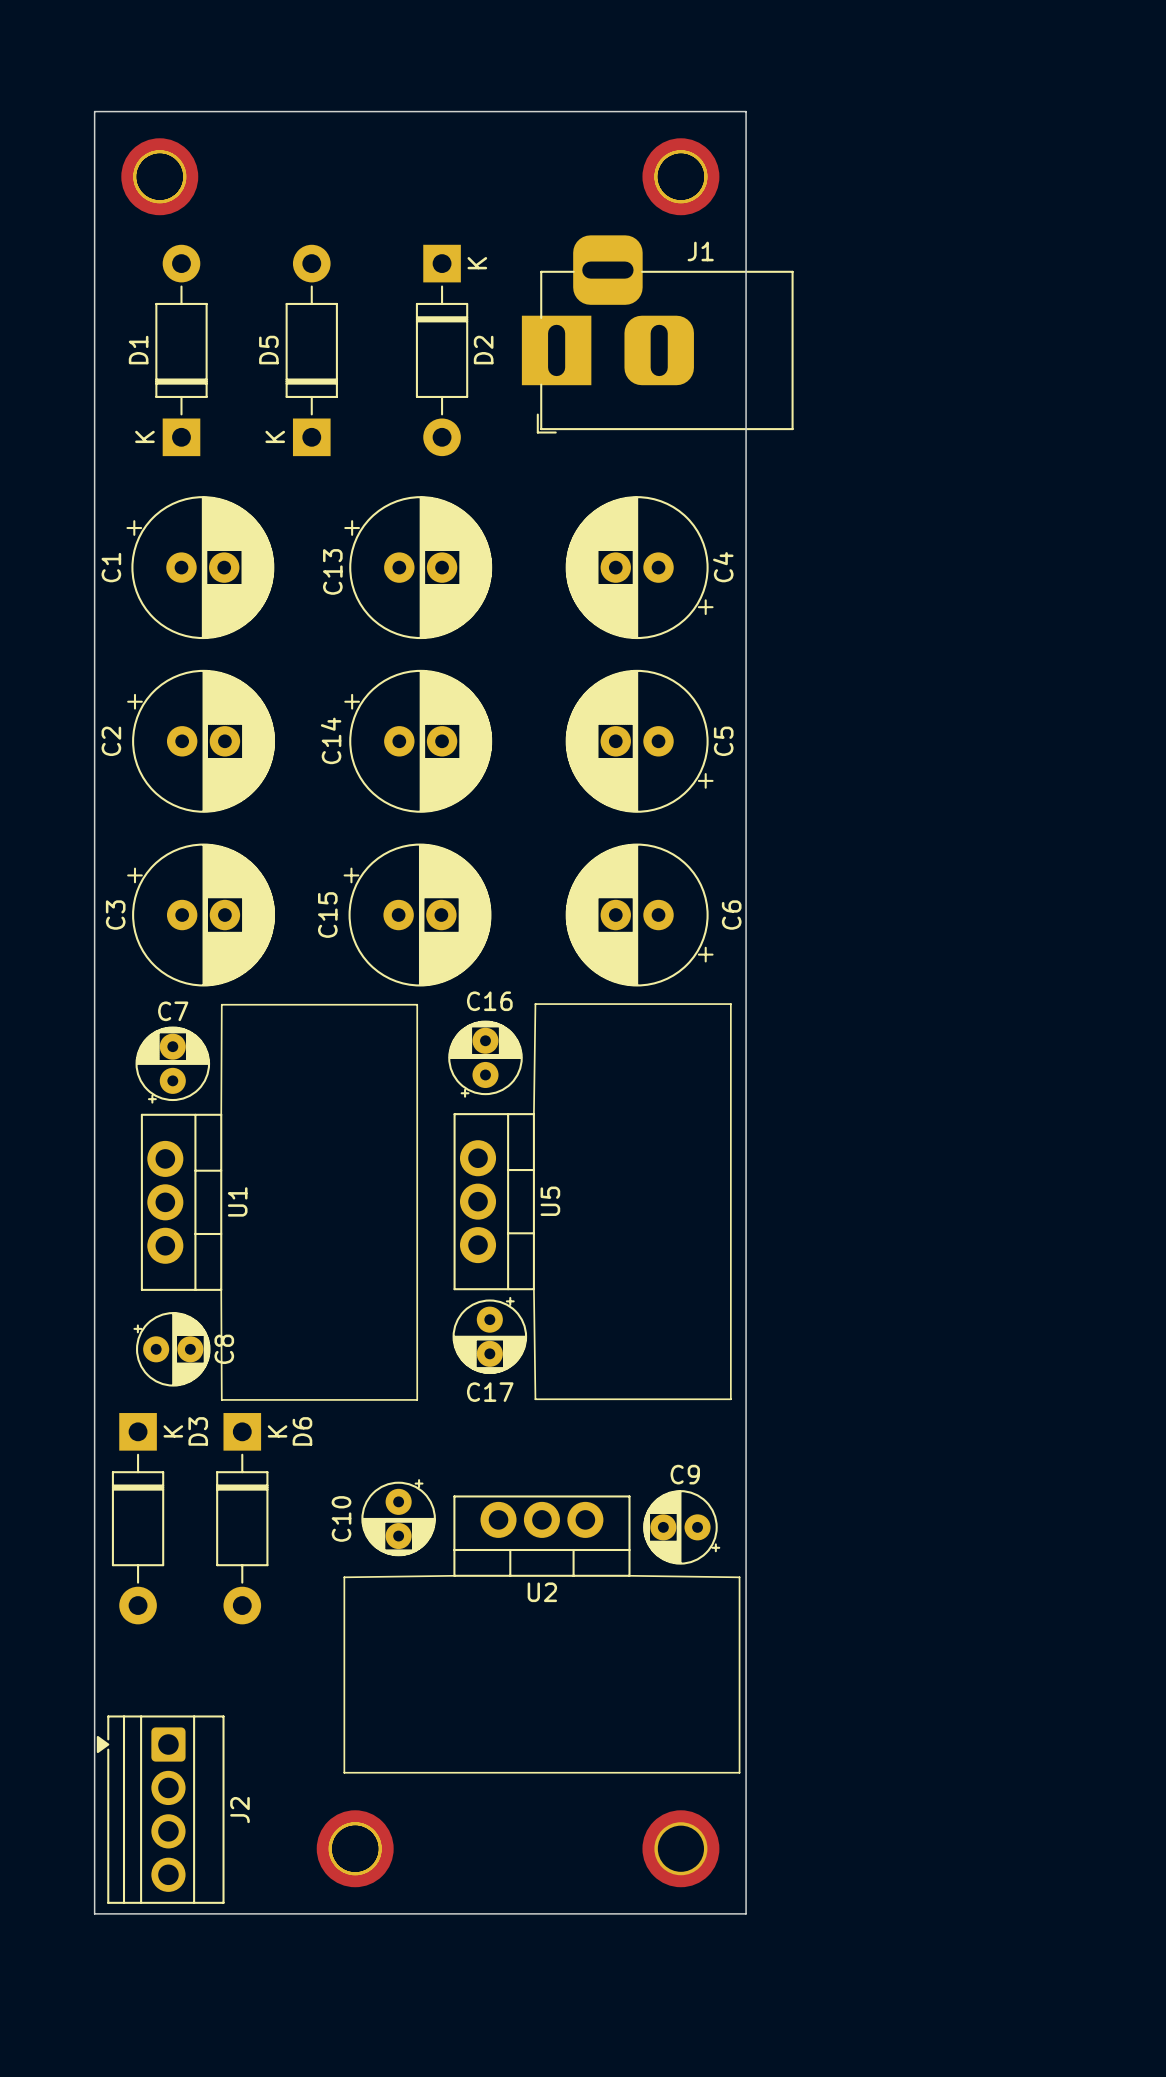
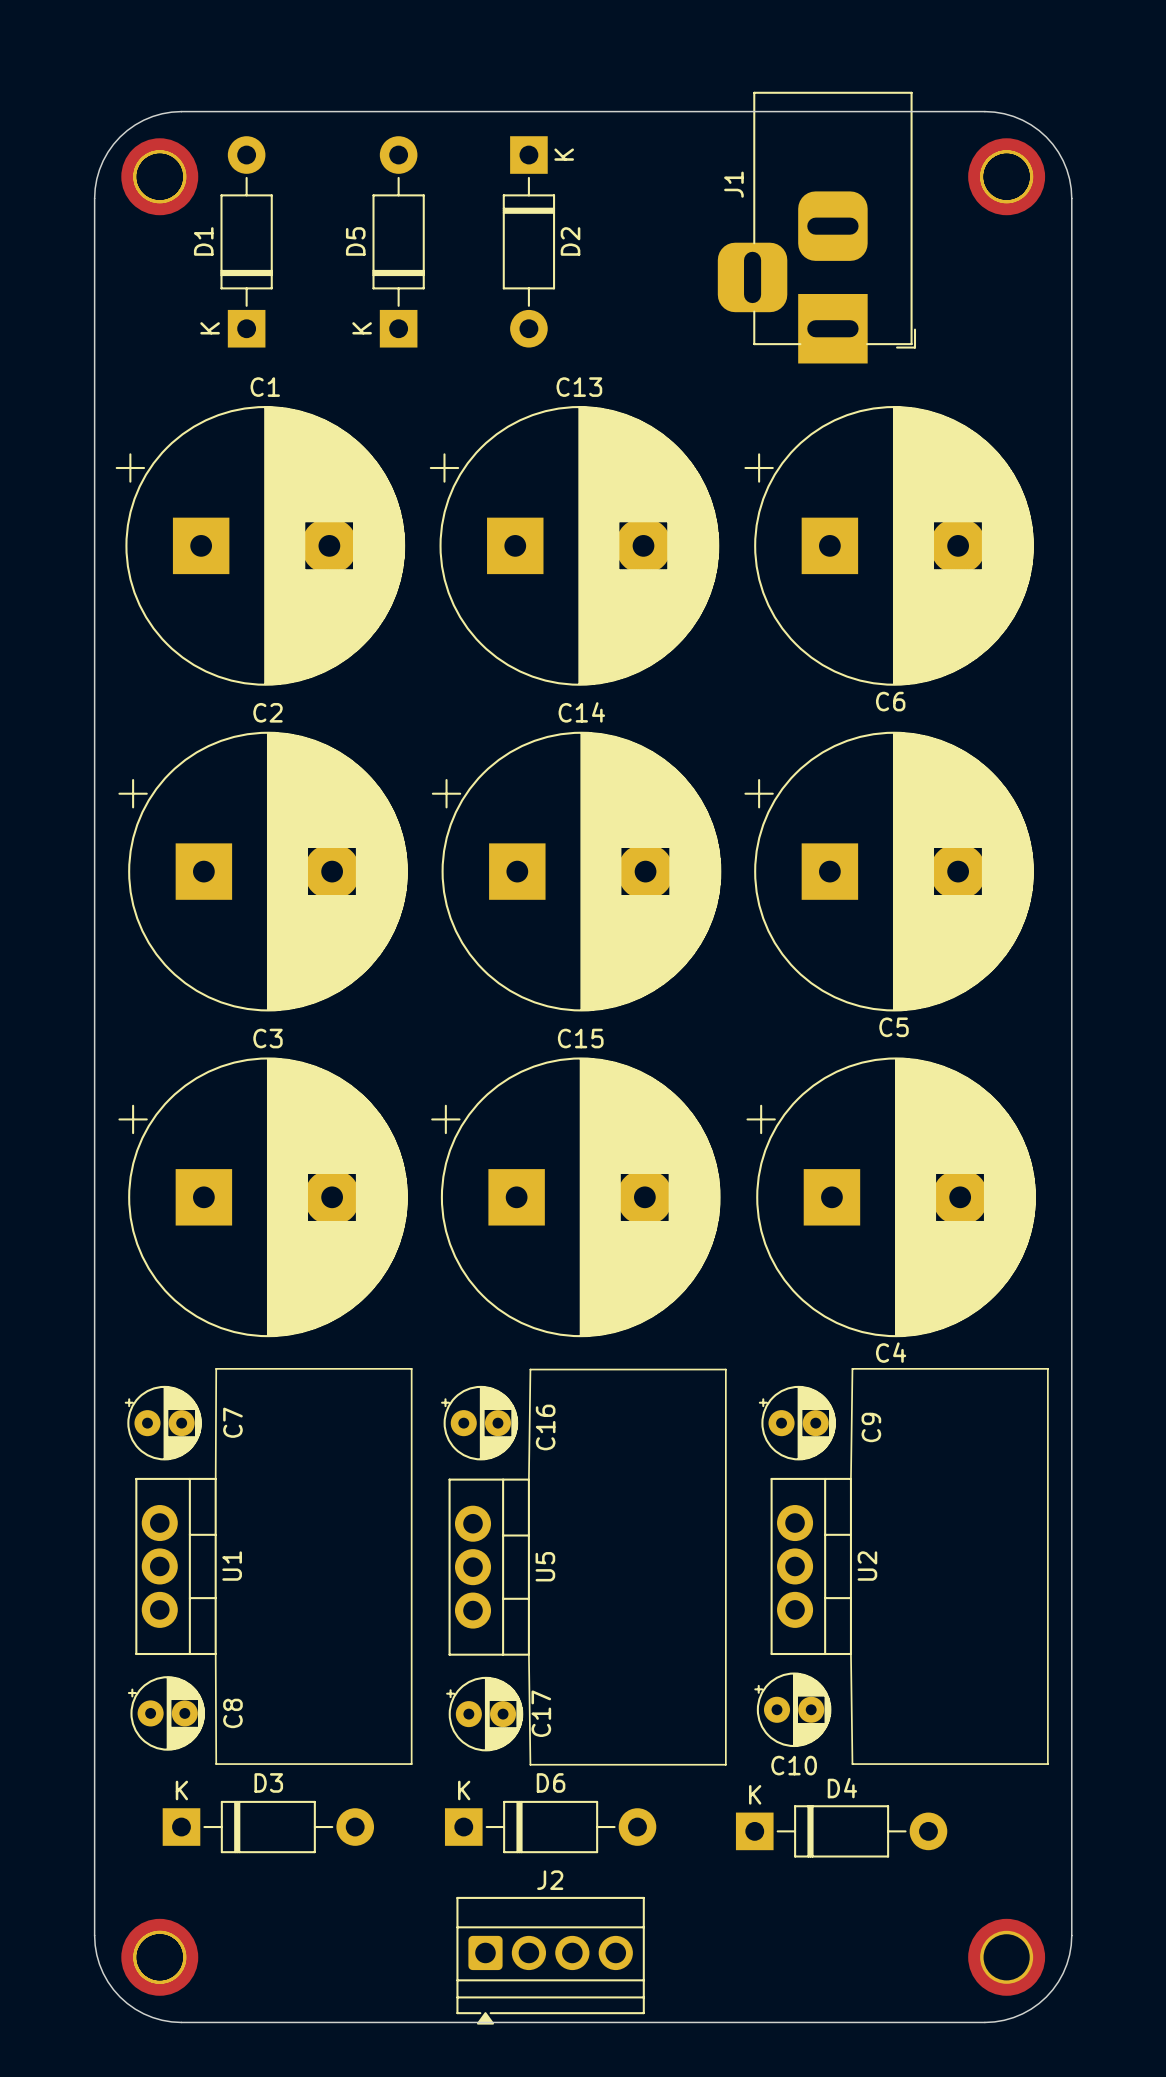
board edge: (181, 111) (94, 111) (94, 198) -> (181, 111) (162, 113) (143, 120) (120, 137) (107, 152) (99, 169) (94, 198)
board edge: (746, 111) (746, 1913) (94, 1913) -> (746, 111) (984, 111) (1004, 113) (1031, 124) (1046, 137) (1058, 152) (1069, 179) (1071, 198) (1071, 1935) (1066, 1964) (1058, 1981) (1039, 2003) (1013, 2017) (994, 2021) (181, 2022) (162, 2020) (143, 2013) (127, 2003) (113, 1989) (103, 1973) (96, 1954) (94, 1913)
part position: (680, 176) -> (1006, 176)
part position: (680, 176) -> (1006, 176)
J1 rotation: 0° (657, 334) -> 90° counterclockwise (816, 227)
J1 position: (657, 334) -> (816, 227)
D1 position: (181, 350) -> (246, 241)
D5 position: (311, 350) -> (398, 241)
D2 position: (442, 350) -> (528, 241)
C1 footprint: [126, 496, 275, 640] -> [115, 406, 406, 686]
C13 footprint: [344, 496, 493, 640] -> [429, 406, 720, 686]
C4 footprint: [565, 496, 714, 640] -> [746, 1057, 1036, 1338]
C1 name position: C1 (111, 567) -> C1 (265, 387)
C4 name position: C4 (723, 567) -> C4 (891, 1352)
C13 name position: C13 (332, 571) -> C13 (579, 387)
C2 footprint: [127, 669, 276, 813] -> [118, 731, 408, 1012]
C14 footprint: [344, 669, 493, 813] -> [431, 731, 722, 1012]
C5 footprint: [565, 669, 714, 813] -> [744, 731, 1034, 1012]
C14 name position: C14 (331, 740) -> C14 (581, 712)
C2 name position: C2 (111, 741) -> C2 (268, 712)
C5 name position: C5 (723, 741) -> C5 (894, 1027)
C3 footprint: [127, 843, 276, 987] -> [118, 1057, 408, 1338]
C15 footprint: [343, 843, 492, 987] -> [431, 1057, 721, 1338]
C6 footprint: [565, 843, 714, 987] -> [744, 406, 1034, 686]
C3 name position: C3 (115, 915) -> C3 (268, 1038)
C15 name position: C15 (327, 915) -> C15 (580, 1038)
C6 name position: C6 (731, 915) -> C6 (890, 701)
C16 rotation: 0° (485, 1059) -> 90° clockwise (479, 1423)
C16 position: (485, 1059) -> (479, 1423)
C7 rotation: 0° (172, 1065) -> 90° clockwise (163, 1423)
C7 position: (172, 1065) -> (163, 1423)
line: (221, 1114) (221, 1004) (417, 1004) (417, 1399) (221, 1399) (221, 1289) -> (215, 1478) (216, 1368) (411, 1368) (411, 1764) (216, 1764) (215, 1654)
line: (533, 1114) (535, 1004) (730, 1004) (730, 1399) (535, 1399) (533, 1289) -> (528, 1479) (530, 1369) (725, 1369) (725, 1764) (530, 1764) (528, 1654)
U5 position: (494, 1201) -> (489, 1567)
U1 position: (181, 1202) -> (176, 1566)
C17 rotation: 0° (489, 1335) -> 90° counterclockwise (484, 1714)
C17 position: (489, 1335) -> (484, 1714)
C8 position: (171, 1349) -> (166, 1713)
C8 name position: C8 (224, 1349) -> C8 (232, 1713)
D3 name position: D3 (198, 1431) -> D3 (268, 1782)
D6 name position: D6 (302, 1431) -> D6 (551, 1782)
C9 name position: C9 (685, 1474) -> C9 (871, 1427)
line: none -> (850, 1478) (852, 1368) (1047, 1368) (1047, 1764) (852, 1764) (850, 1654)
C10 rotation: 0° (398, 1517) -> 90° counterclockwise (792, 1709)
C10 position: (398, 1517) -> (792, 1709)
D3 rotation: 0° (138, 1518) -> 90° counterclockwise (268, 1827)
D3 position: (138, 1518) -> (268, 1827)
D6 rotation: 0° (242, 1518) -> 90° counterclockwise (550, 1827)
D6 position: (242, 1518) -> (550, 1827)
C9 rotation: 0° (681, 1527) -> 180° (797, 1423)
C9 position: (681, 1527) -> (797, 1423)
U2 rotation: 0° (541, 1536) -> 90° counterclockwise (811, 1566)
U2 position: (541, 1536) -> (811, 1566)
line: (454, 1575) (344, 1577) (344, 1772) (739, 1772) (739, 1577) (629, 1575) -> none
J2 rotation: 0° (160, 1809) -> 90° counterclockwise (550, 1960)
J2 position: (160, 1809) -> (550, 1960)
D4: none -> (841, 1831)
part position: (355, 1848) -> (159, 1957)
part position: (355, 1848) -> (159, 1957)
part: (680, 1848) -> none
part: none -> (1006, 1957)

